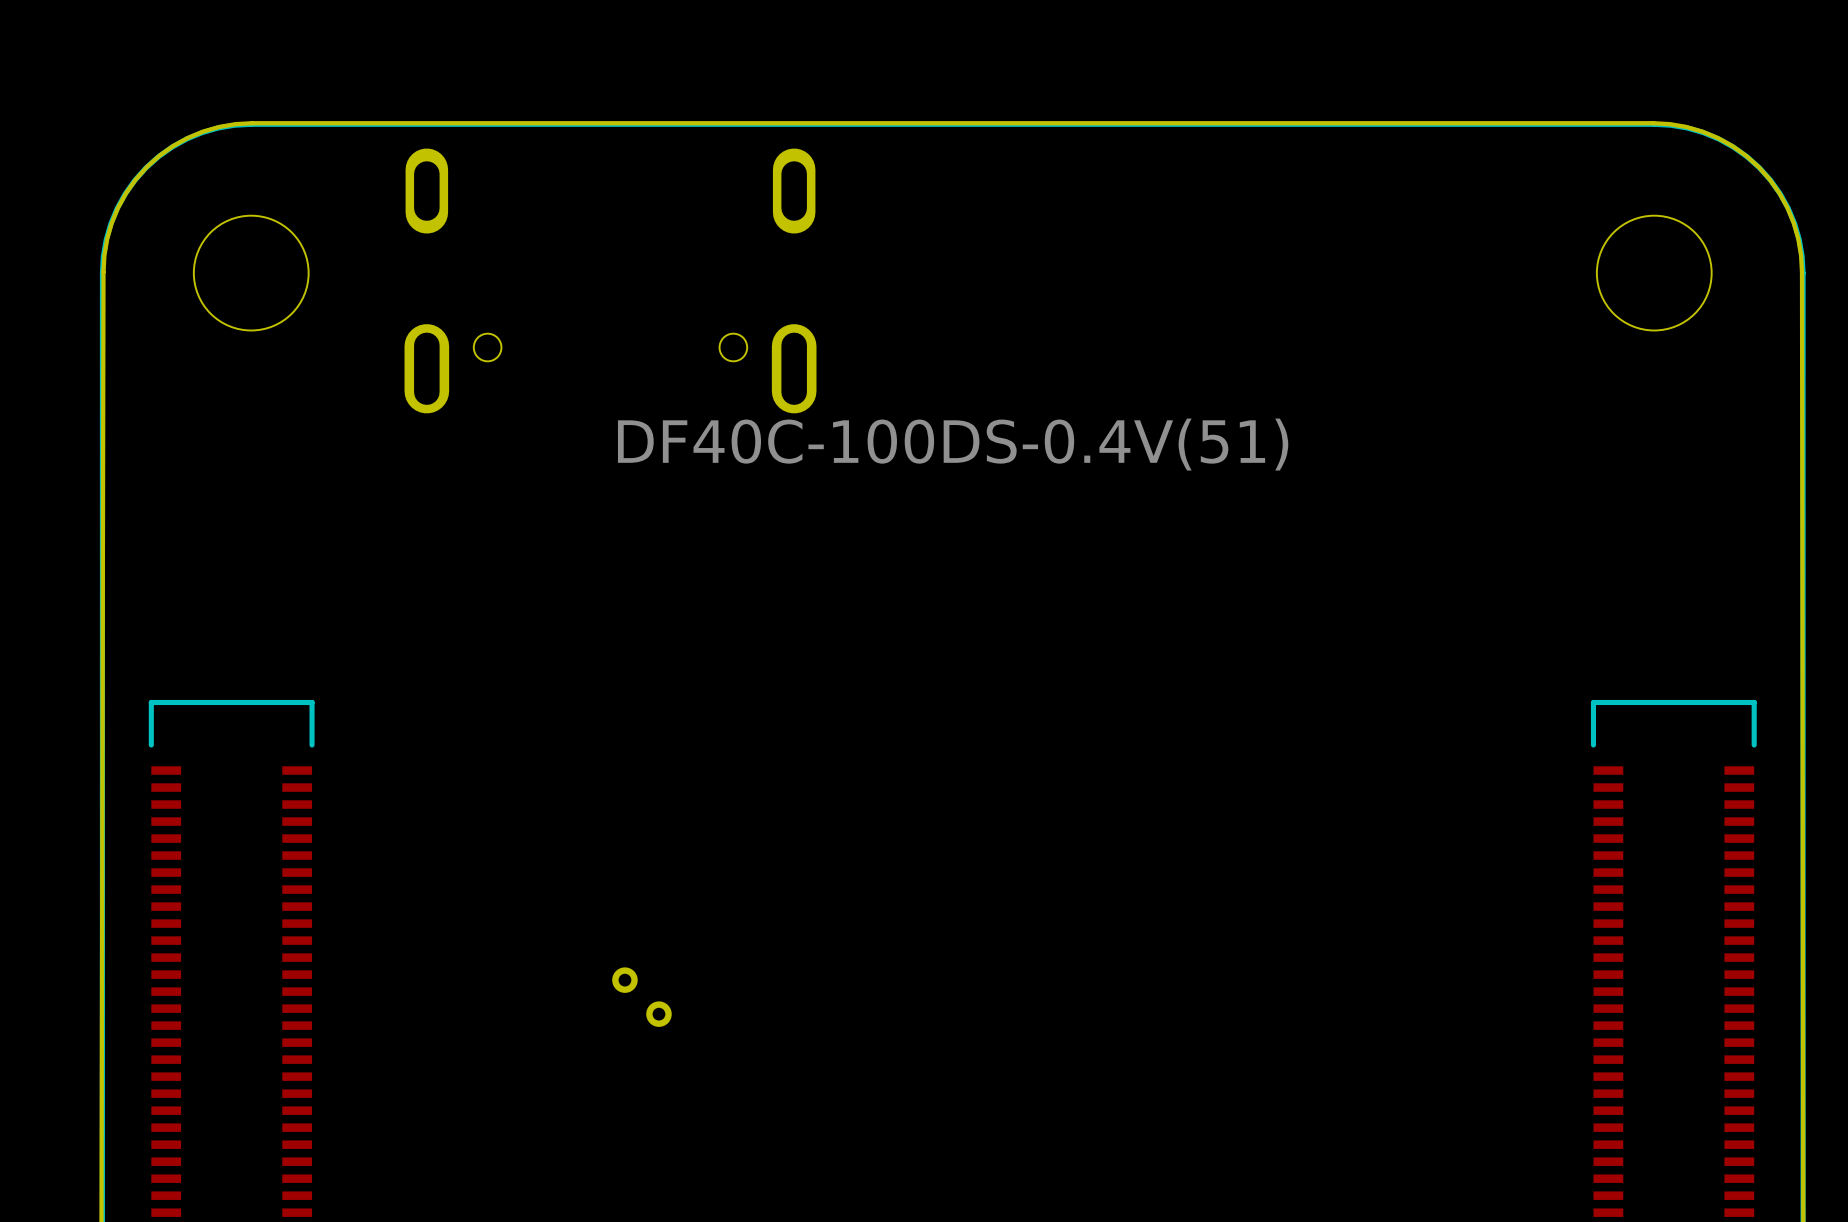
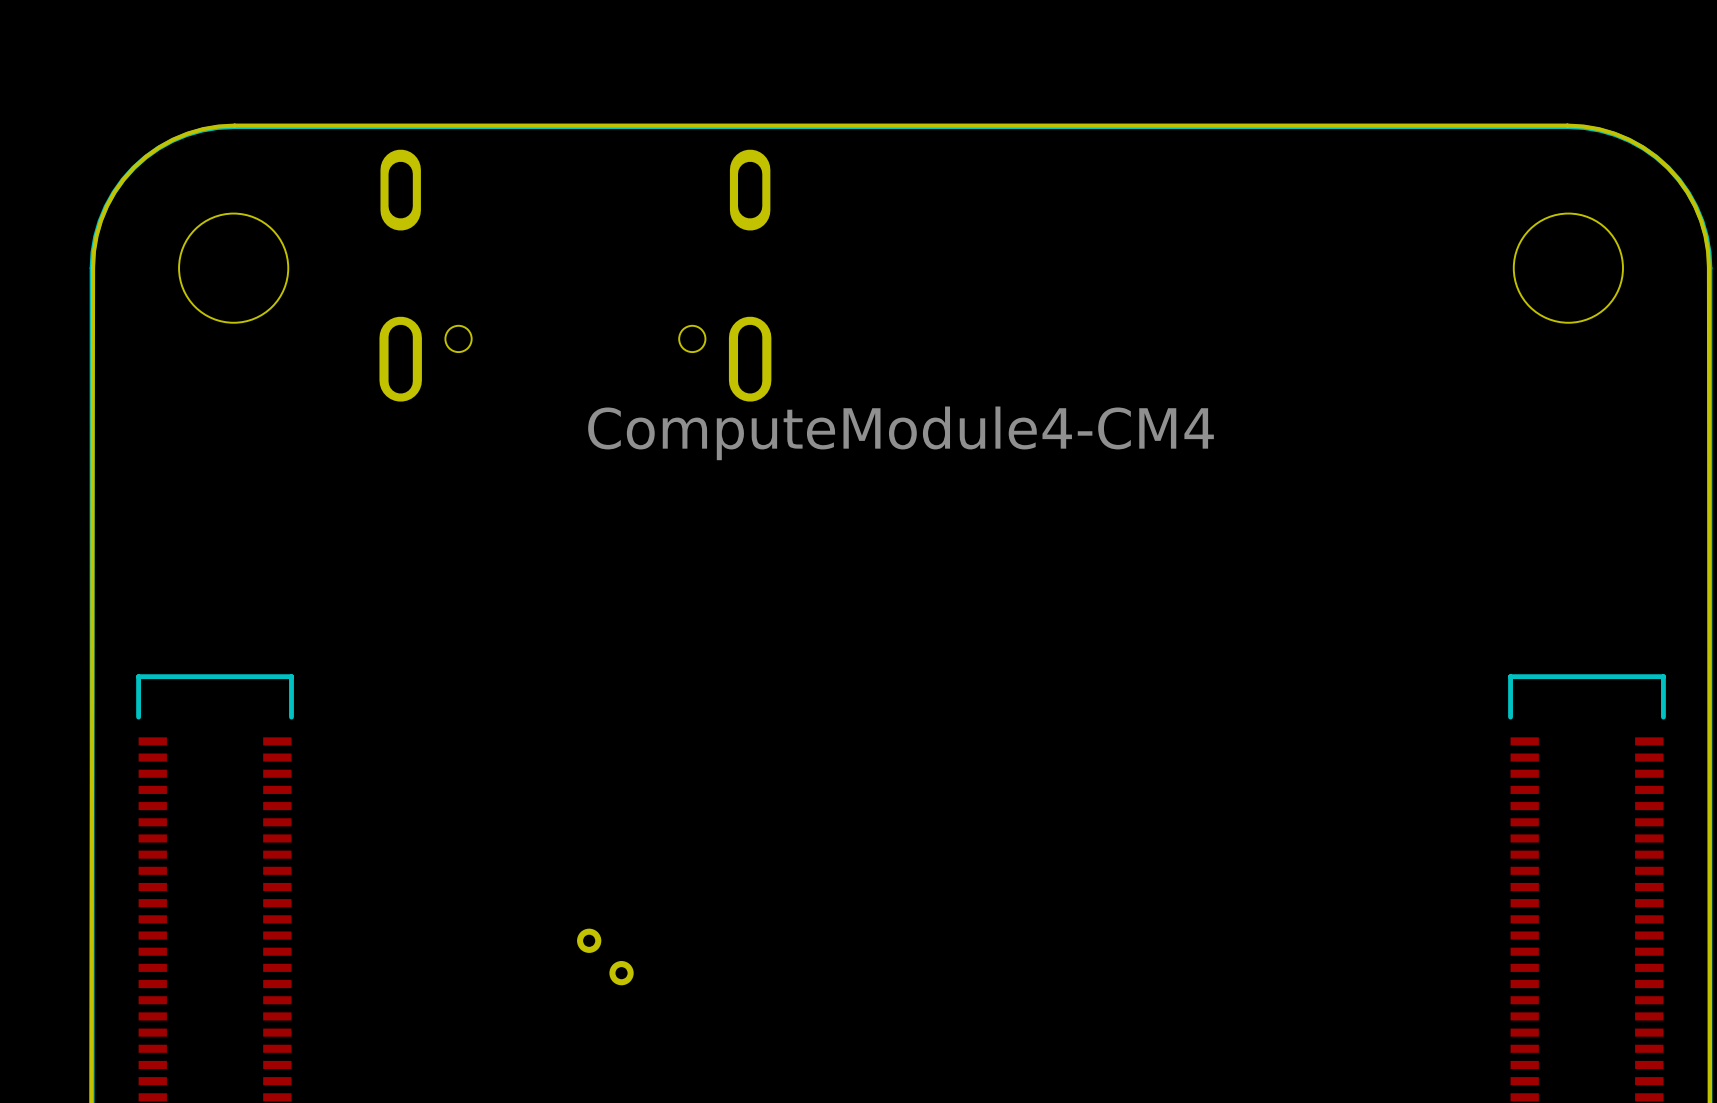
part value: DF40C-100DS-0.4V(51) (953, 444) -> ComputeModule4-CM4 (901, 433)

